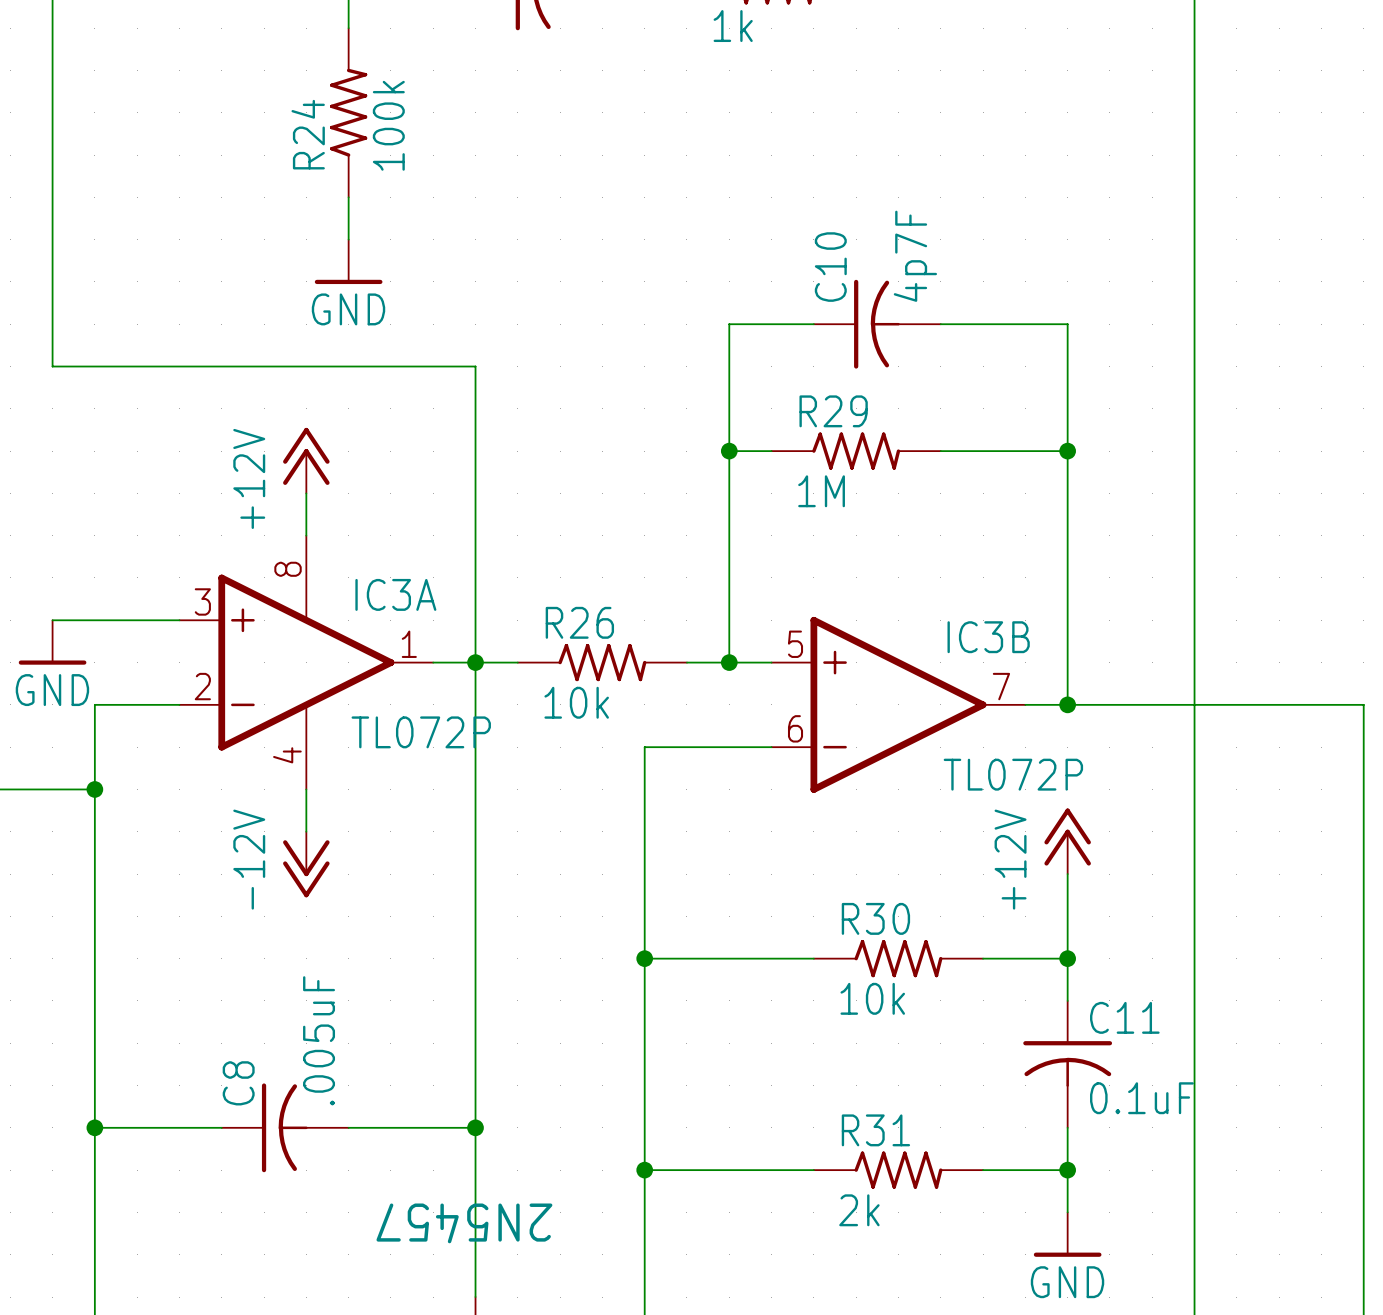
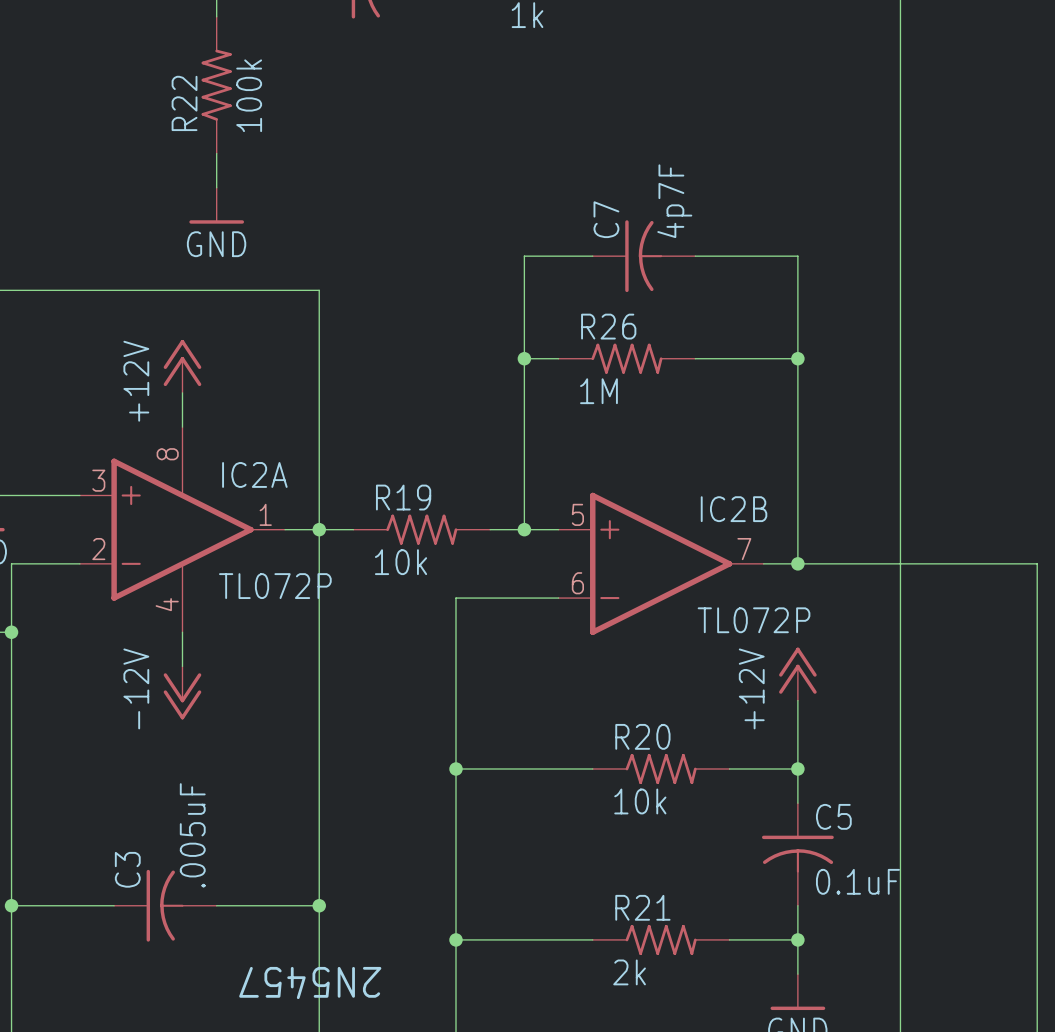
R24 name: R24 (308, 134) -> R22 (184, 103)
C10 name: C10 (830, 267) -> C7 (606, 219)
R29 name: R29 (833, 411) -> R26 (608, 326)
IC3A name: IC3A (395, 594) -> IC2A (254, 474)
R26 name: R26 (579, 622) -> R19 (403, 497)
IC3B name: IC3B (988, 637) -> IC2B (734, 509)
R30 name: R30 (875, 918) -> R20 (642, 736)
C11 name: C11 (1124, 1017) -> C5 (833, 816)
C8 name: C8 (238, 1083) -> C3 (127, 869)
R31 name: R31 (875, 1130) -> R21 (642, 907)

